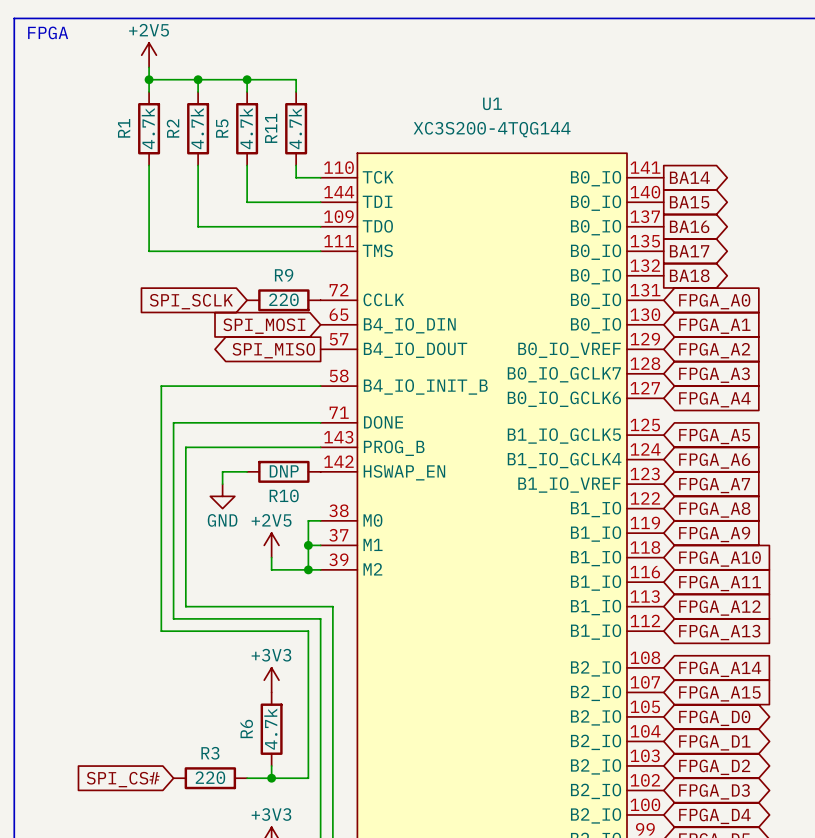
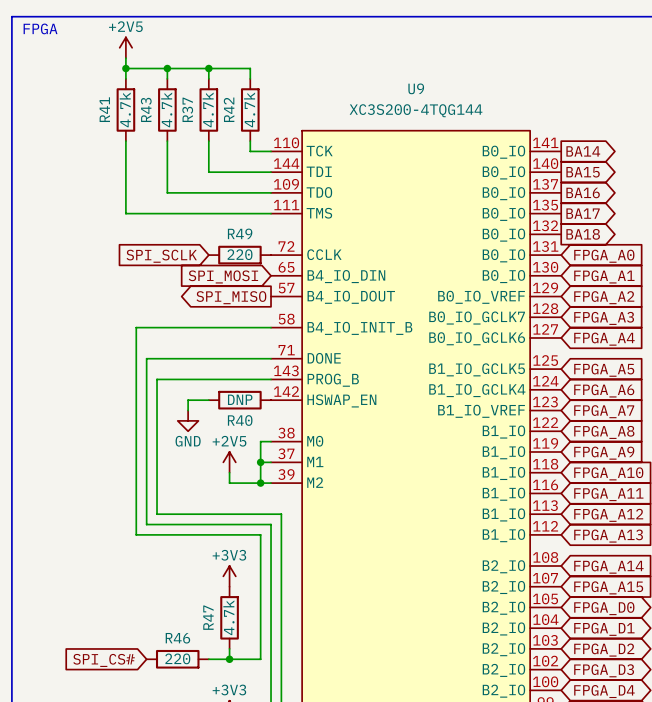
U1 name: U1 (492, 103) -> U9 (416, 88)
R1 name: R1 (124, 128) -> R41 (104, 109)
R2 name: R2 (173, 128) -> R43 (146, 109)
R5 name: R5 (222, 128) -> R37 (187, 109)
R11 name: R11 (271, 128) -> R42 (229, 109)
R9 name: R9 (284, 275) -> R49 (240, 233)
R10 name: R10 (284, 495) -> R40 (240, 420)
R6 name: R6 (246, 728) -> R47 (208, 617)
R3 name: R3 (210, 753) -> R46 (177, 638)

